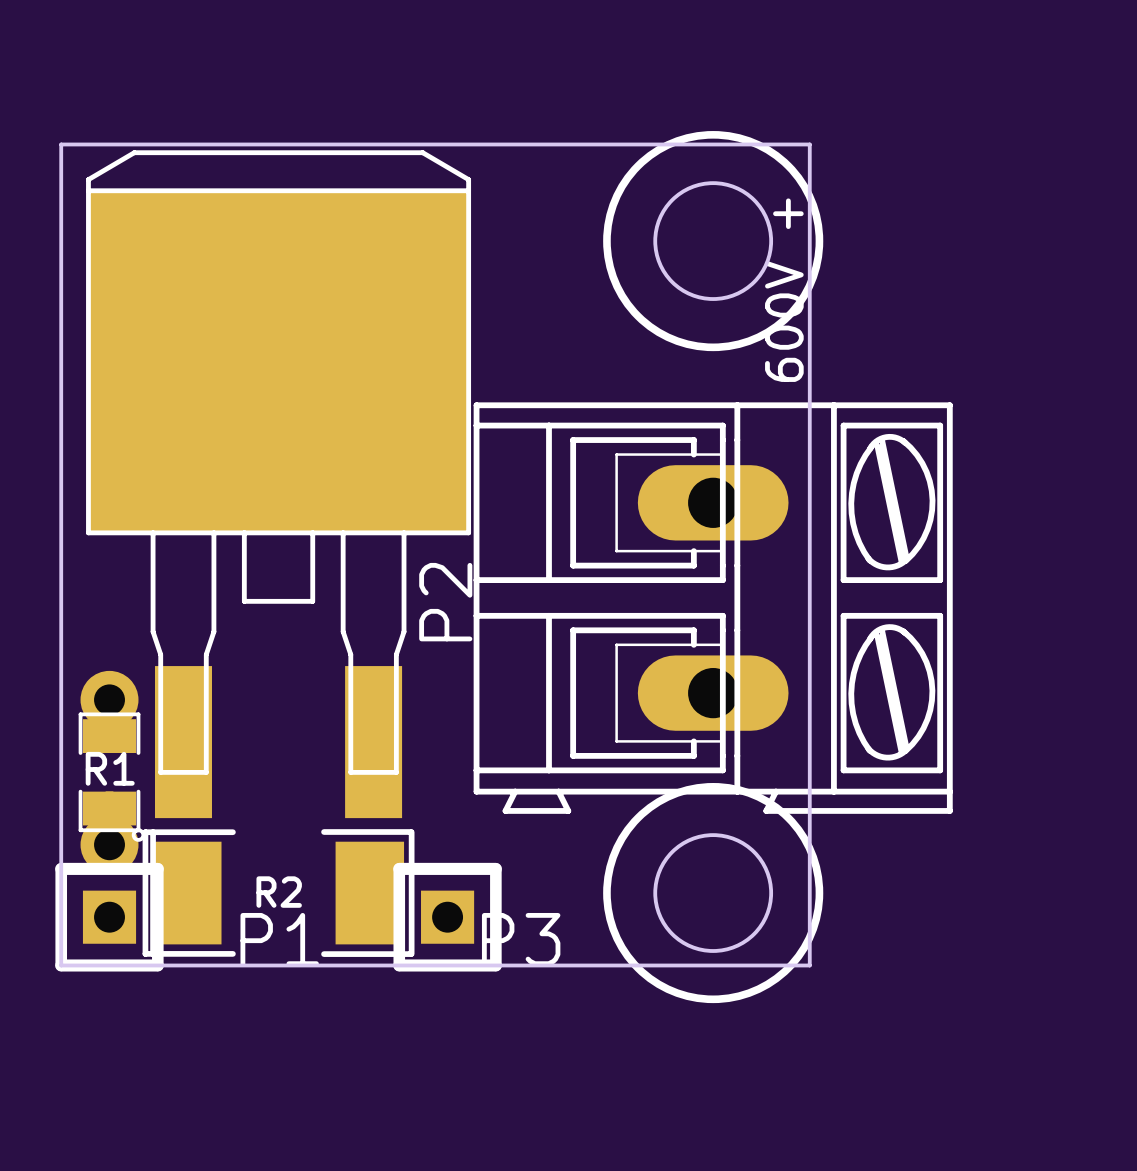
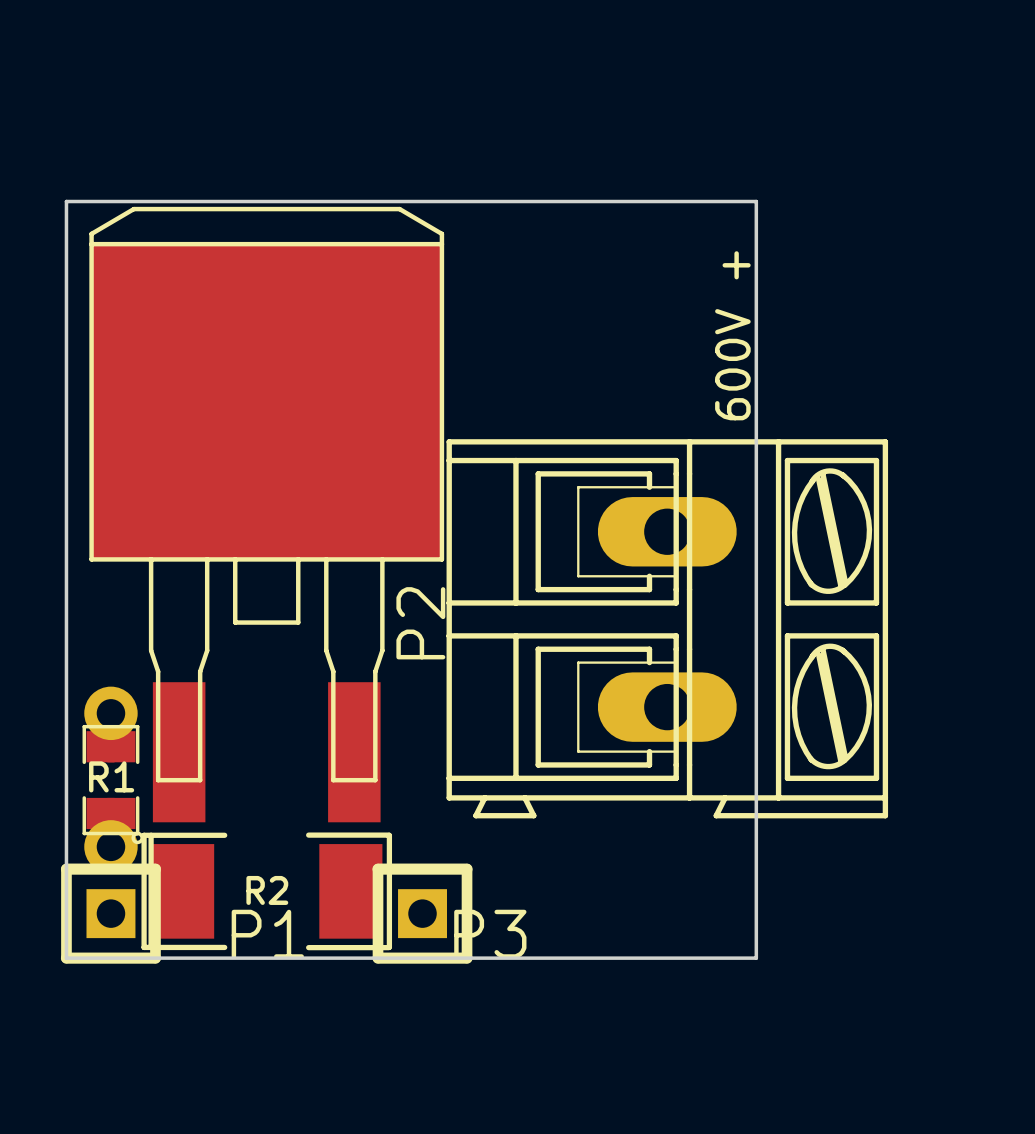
drawing: [603, 131, 824, 352] -> none
round board edge: [653, 181, 774, 301] -> none
drawing: [603, 783, 824, 1004] -> none
round board edge: [653, 833, 774, 953] -> none

